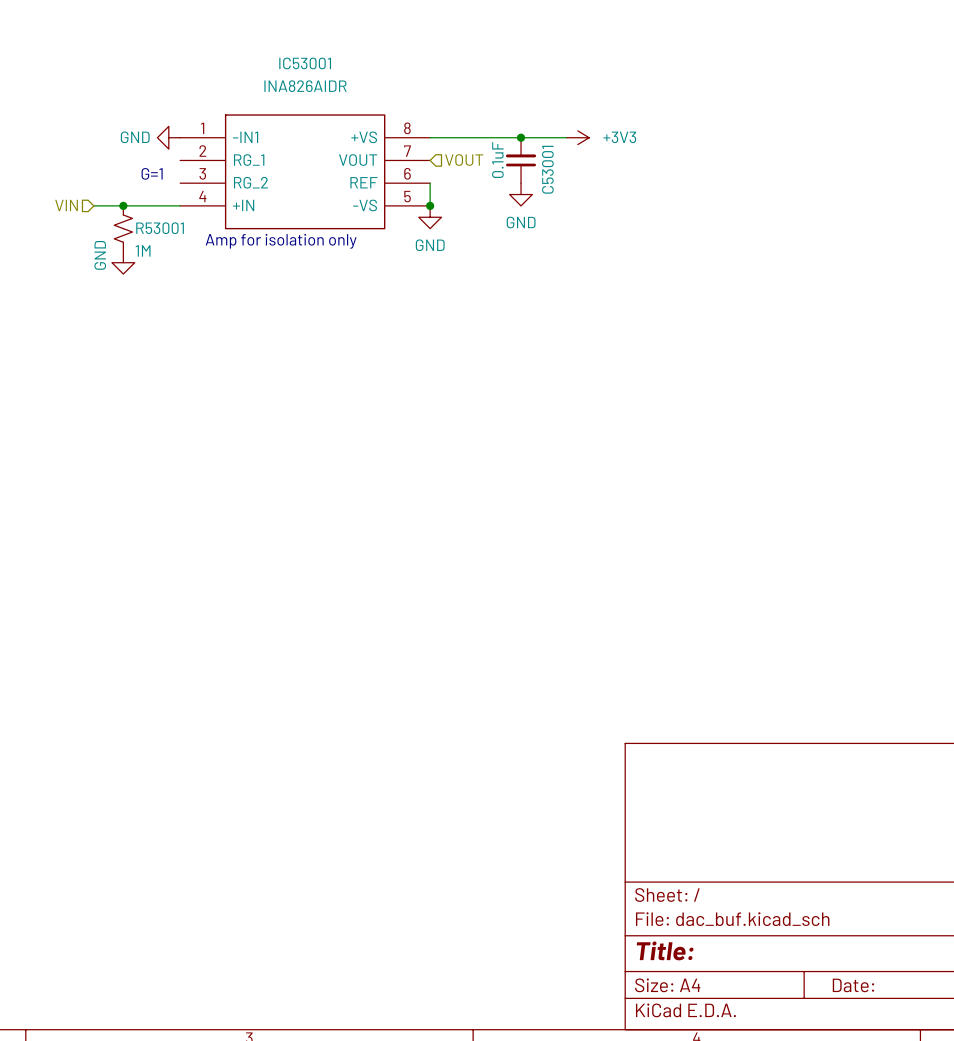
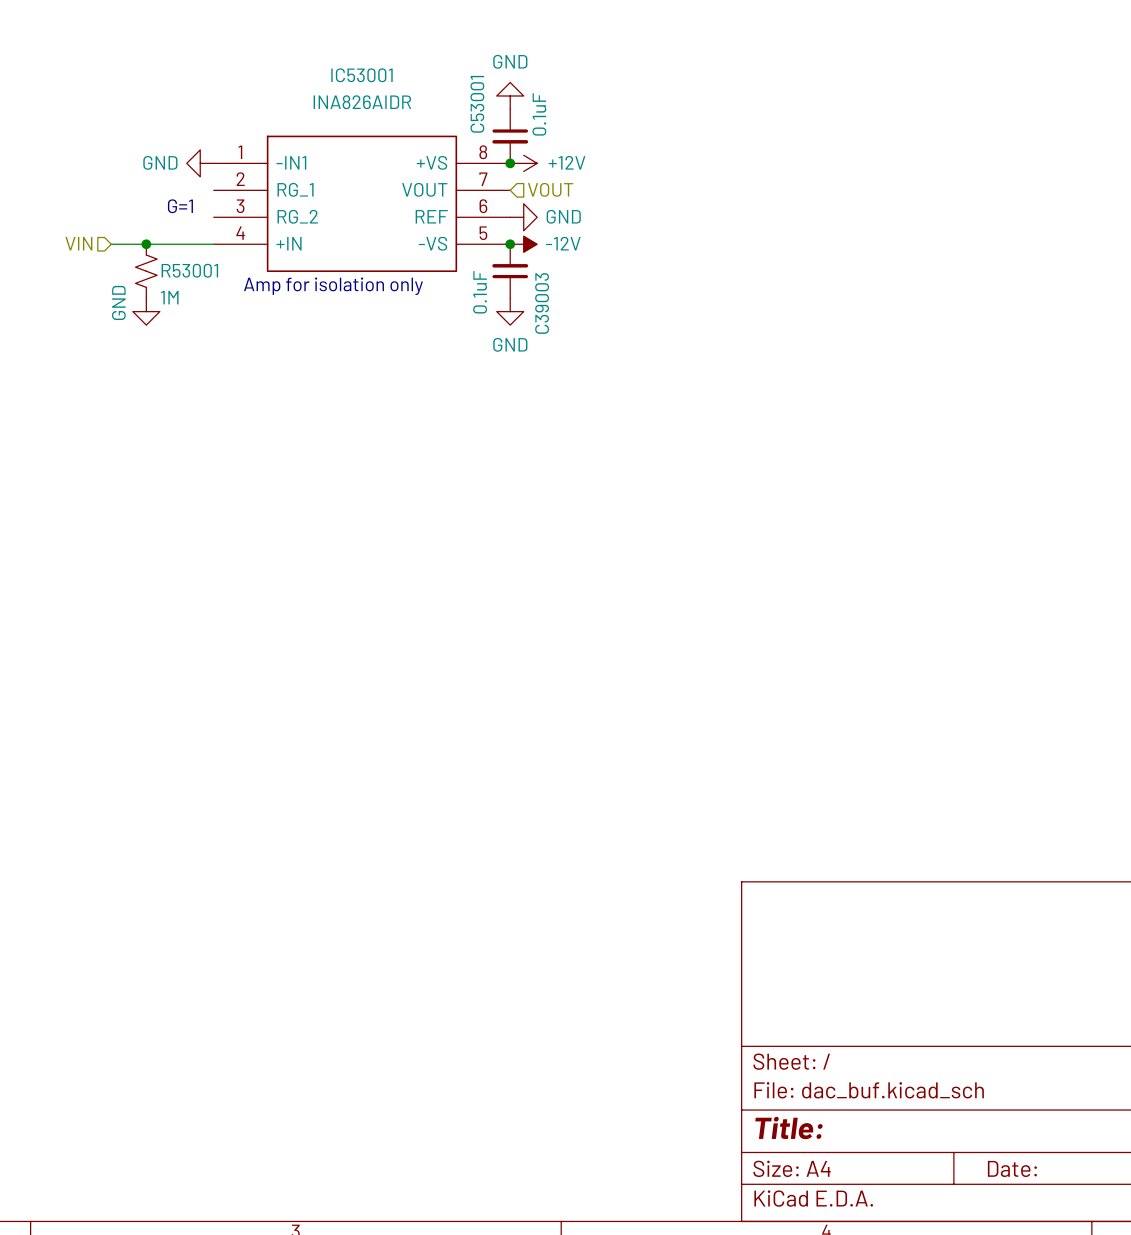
power symbol: none -> GND (510, 95)
wire: (430, 137) (566, 137) -> none
junction: none -> (510, 163)
power symbol: none -> +12V (523, 163)
junction: (521, 137) -> none
power symbol: +3V3 (577, 137) -> none
C53001 value position: 0.1uF (497, 160) -> 0.1uF (539, 114)
C53001 rotation: 0° (521, 160) -> 180° (510, 136)
C53001 position: (521, 160) -> (510, 136)
C53001 name position: C53001 (547, 169) -> C53001 (477, 104)
wire: (430, 183) (430, 205) -> none
power symbol: none -> GND (523, 217)
power symbol: GND (521, 194) -> none
power symbol: none -> -12V (523, 244)
power symbol: GND (430, 217) -> none
C39003: none -> 0.1uF (510, 271)
power symbol: none -> GND (510, 311)

